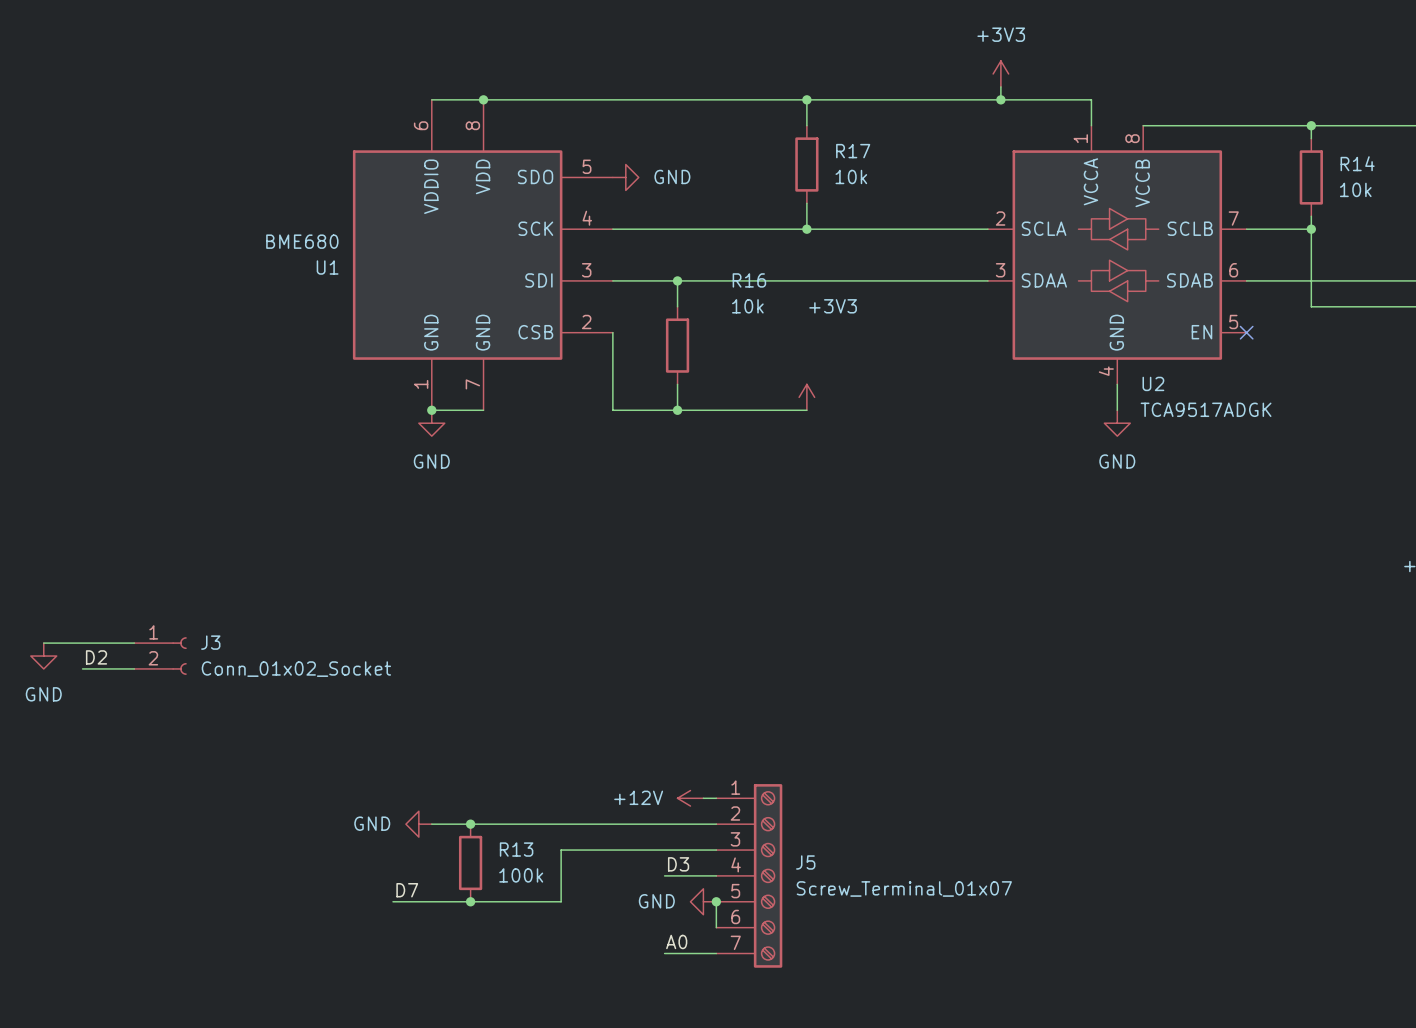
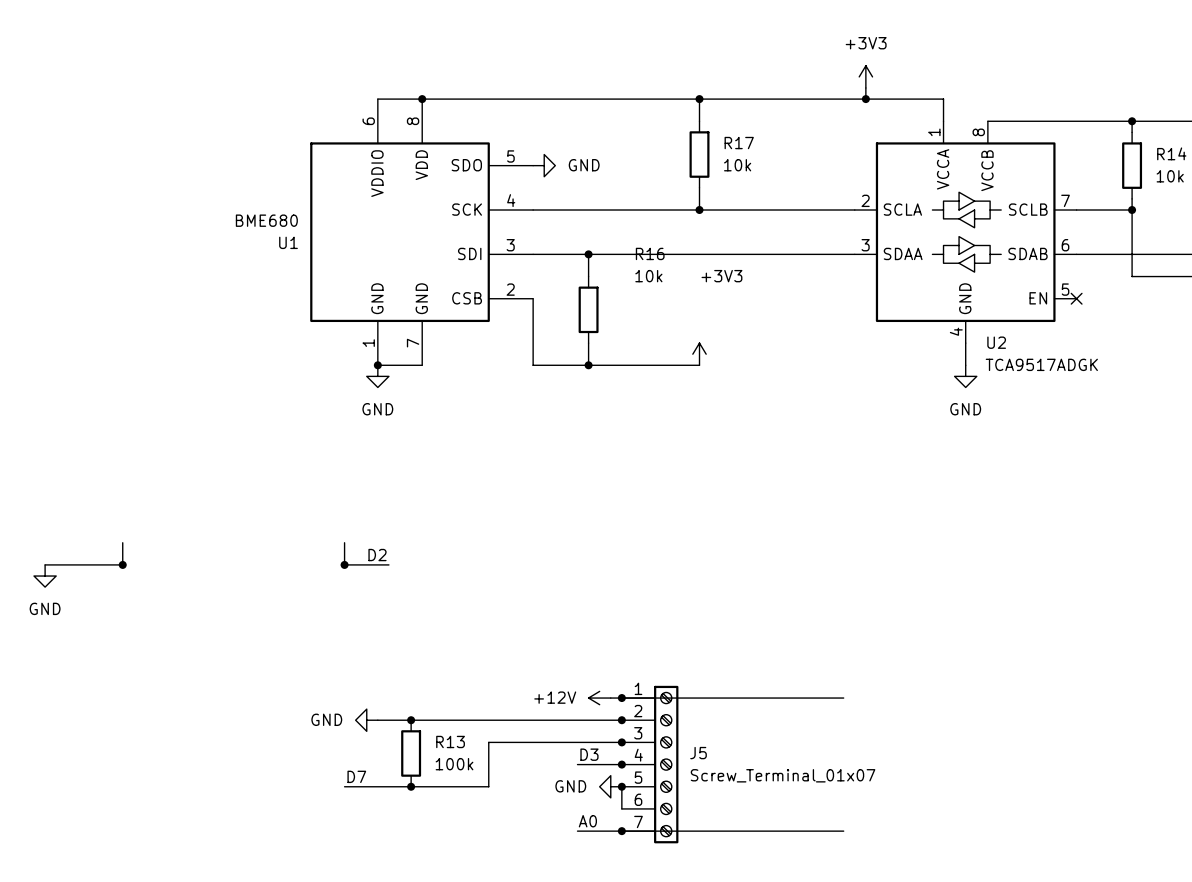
wire: none -> (122, 542) (122, 564)
wire: none -> (344, 542) (344, 564) (388, 564)
label: none -> D2 (377, 555)
junction: none -> (122, 564)
junction: none -> (344, 564)
J3: Conn_01x02_Socket (160, 656) -> none
label: D2 (96, 657) -> none
wire: (82, 668) (134, 668) -> none
wire: none -> (621, 698) (843, 698)
junction: none -> (621, 698)
junction: none -> (621, 720)
junction: none -> (621, 742)
junction: none -> (621, 764)
wire: none -> (621, 831) (843, 831)
junction: none -> (621, 831)

